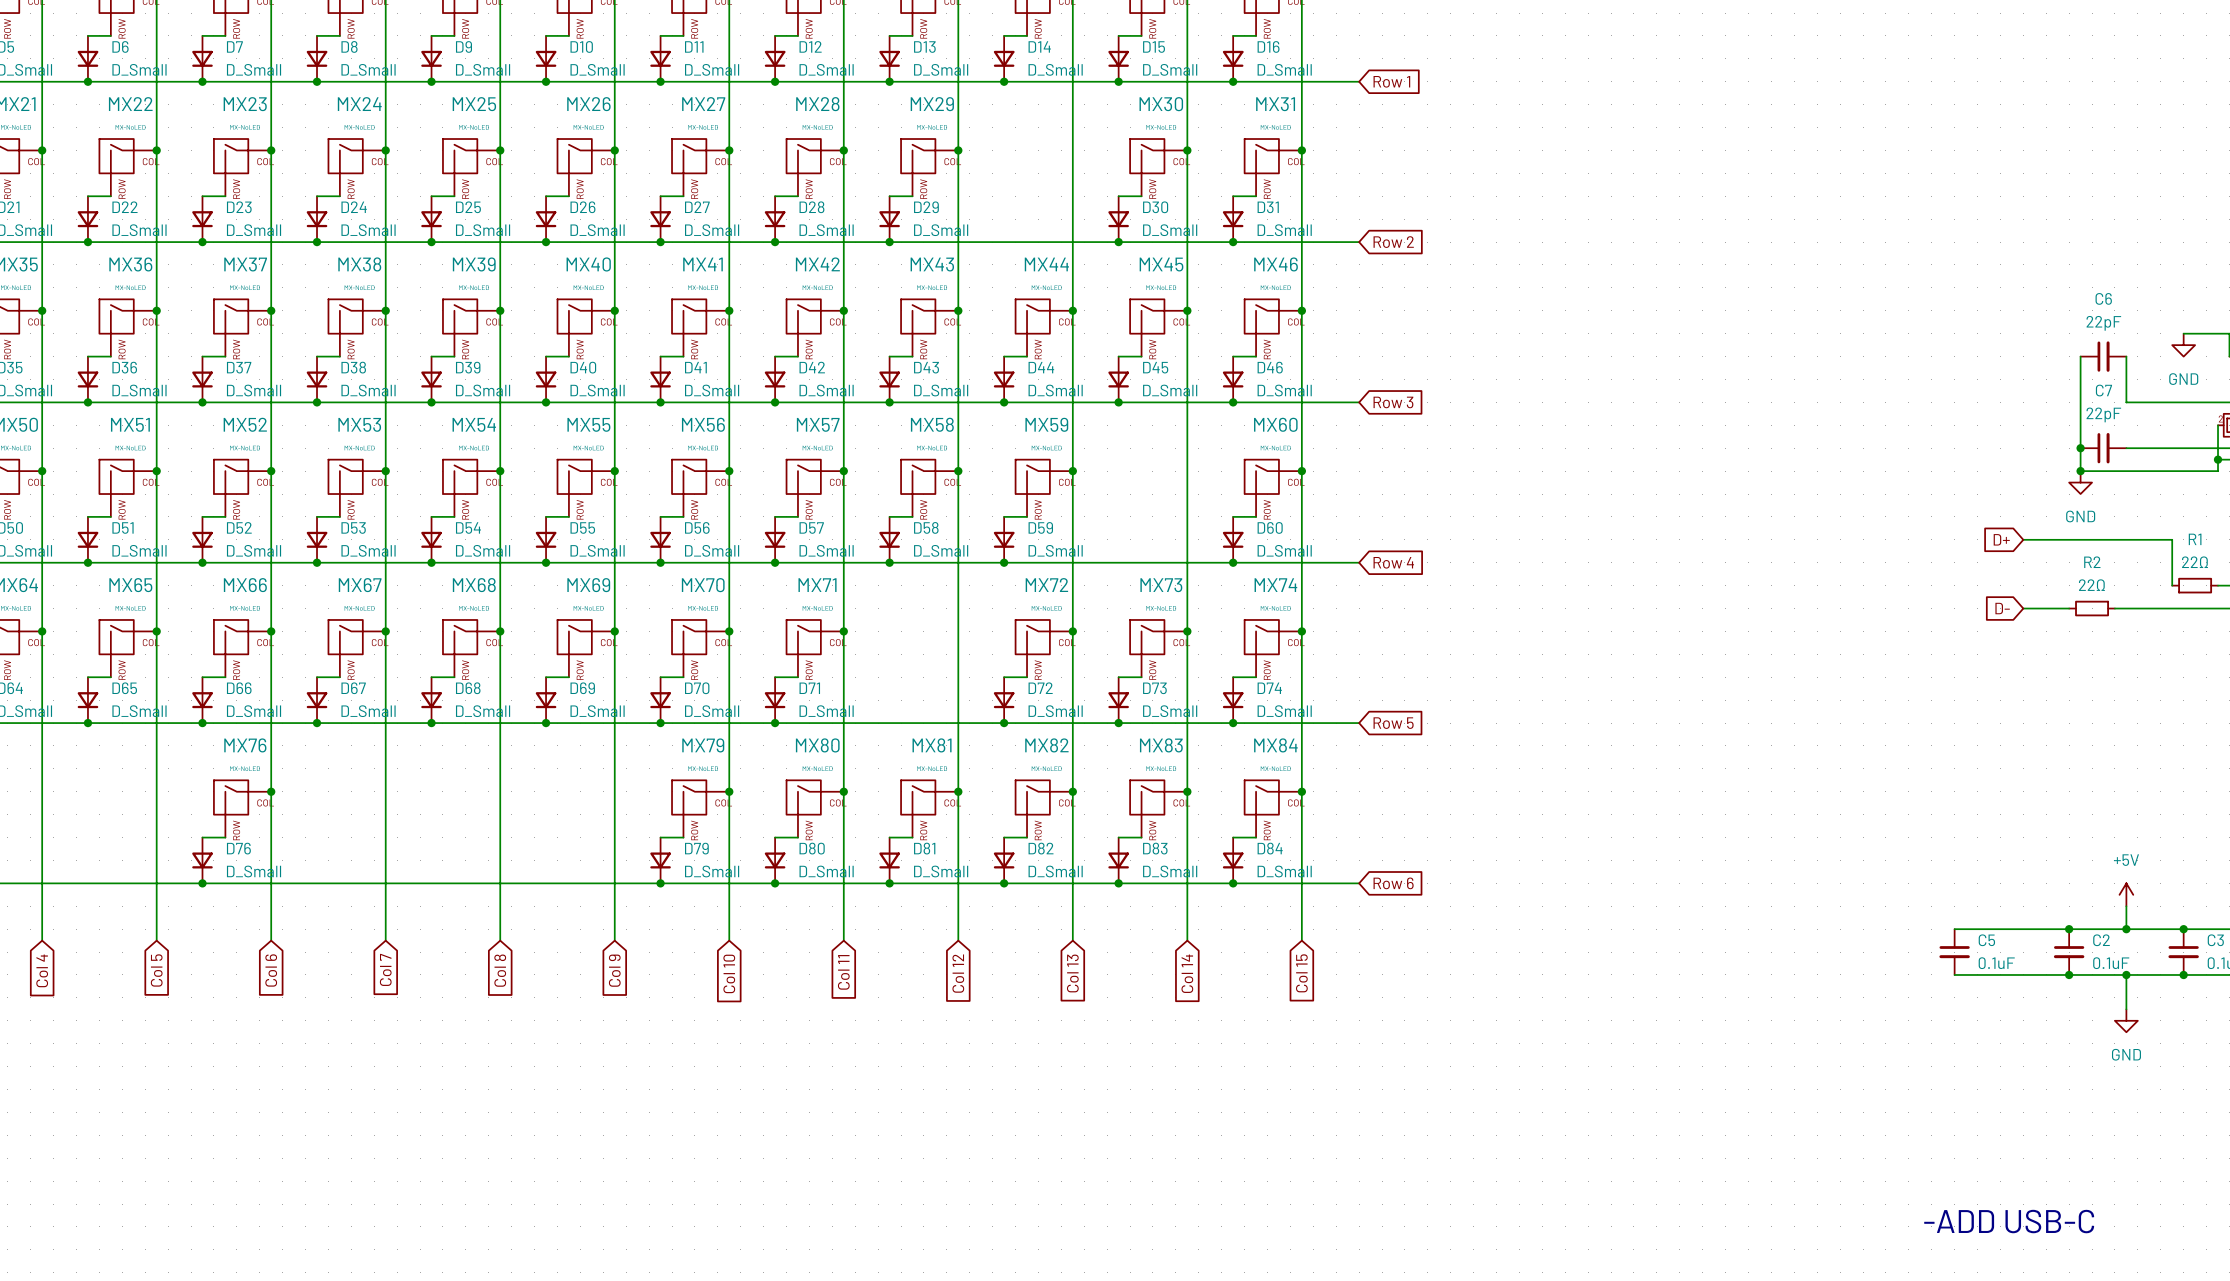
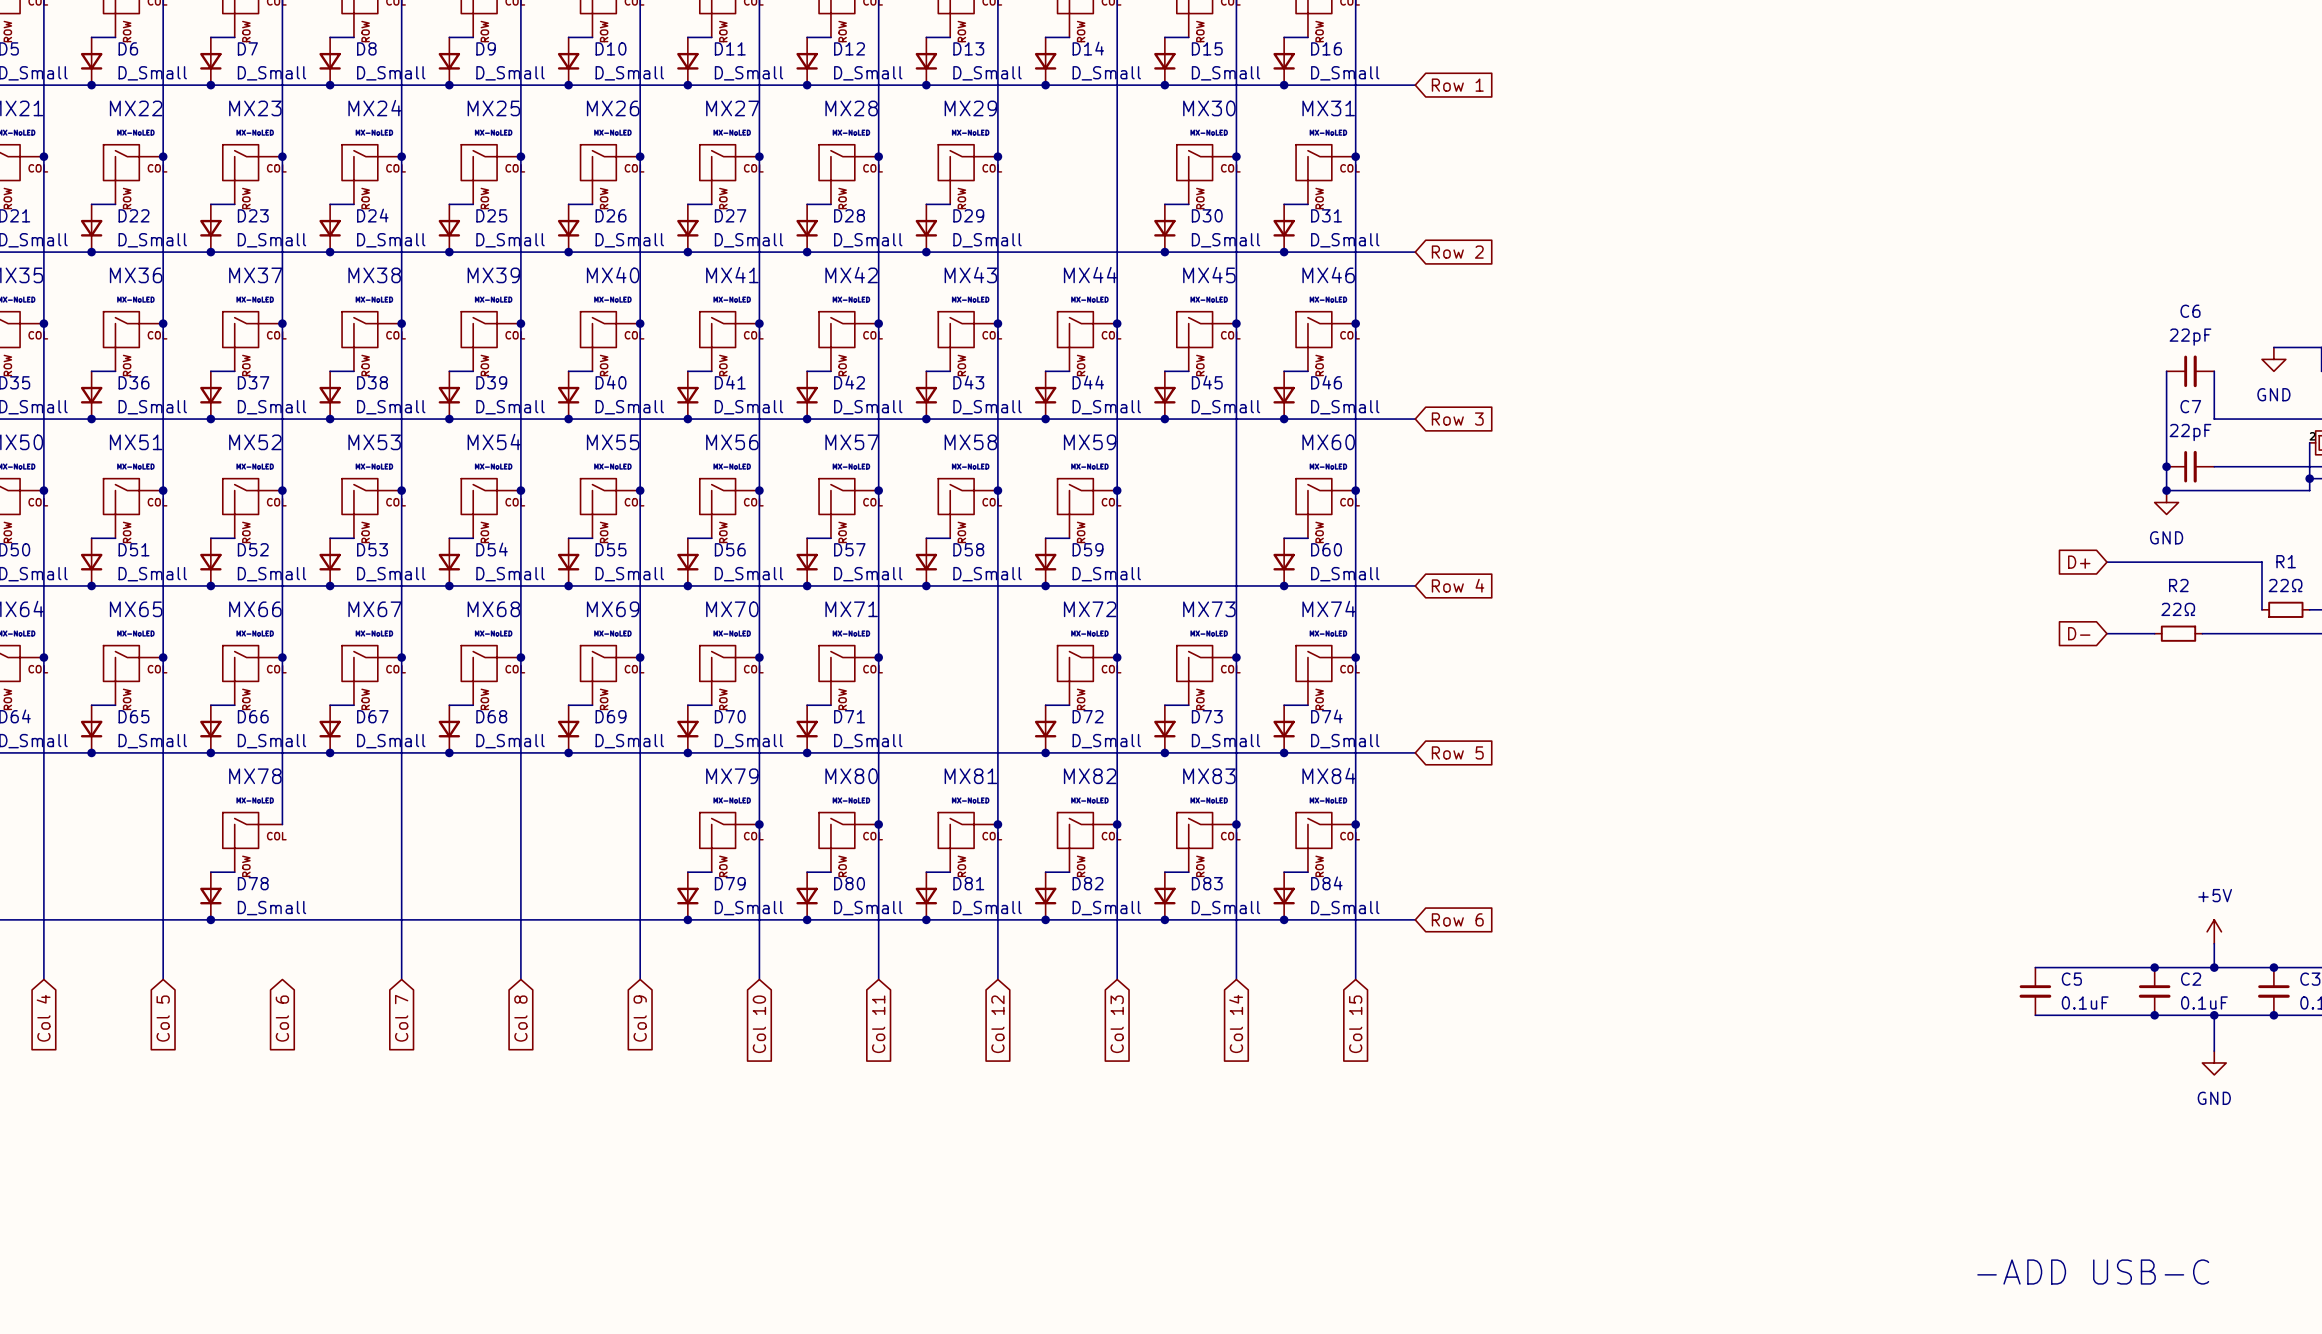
MX76 name: MX76 (245, 745) -> MX78 (255, 776)
wire: (271, 791) (271, 940) -> none
junction: (271, 791) -> none
D76 name: D76 (238, 848) -> D78 (253, 883)

